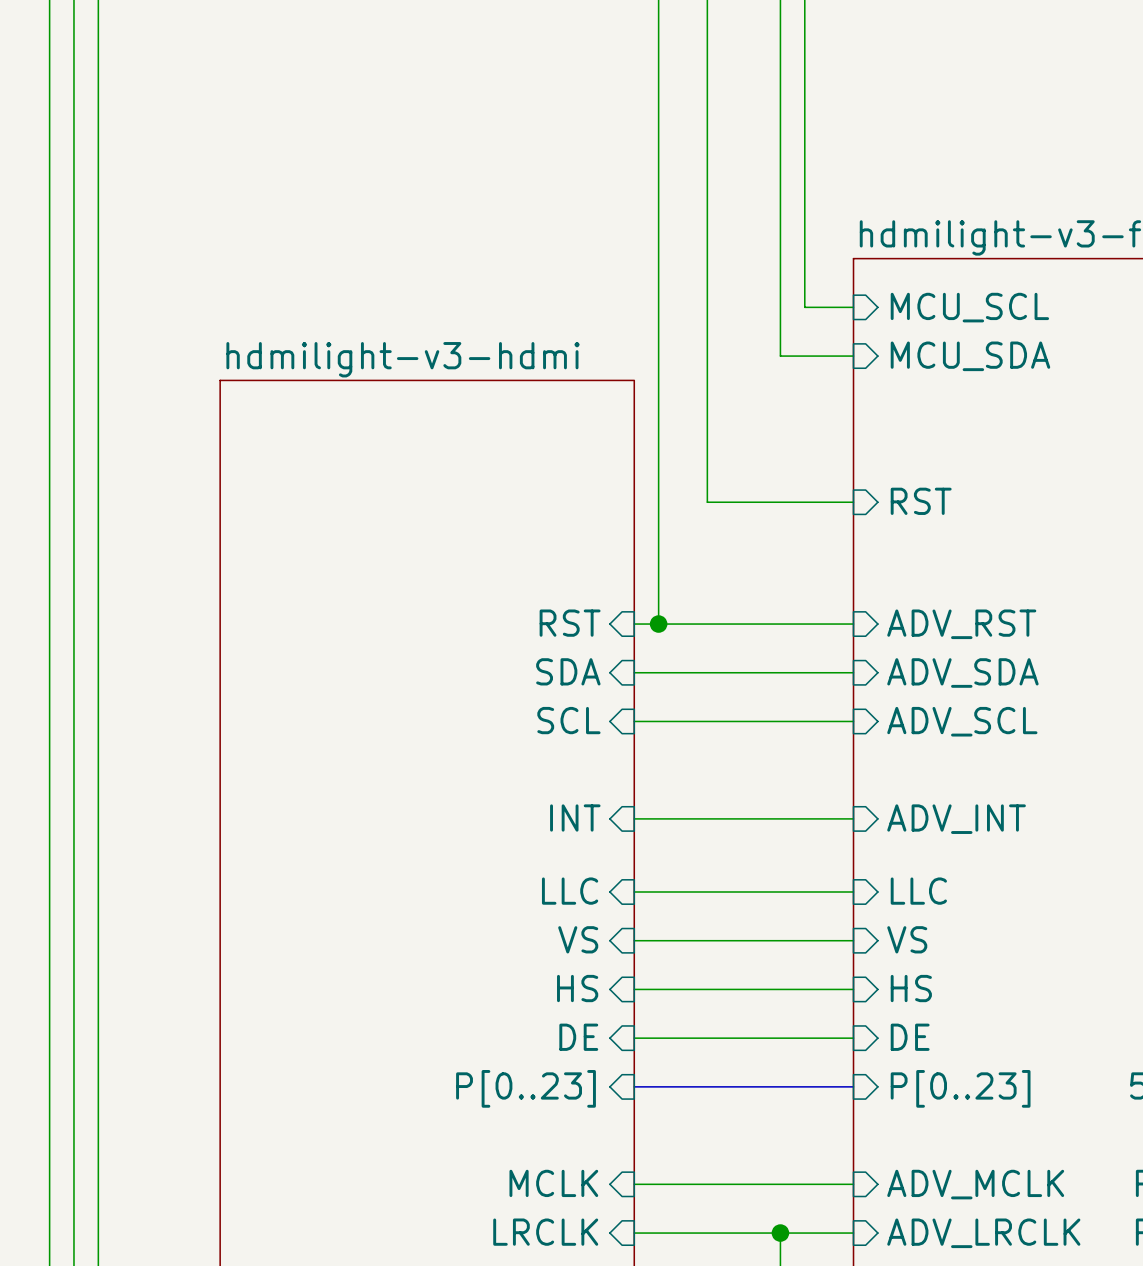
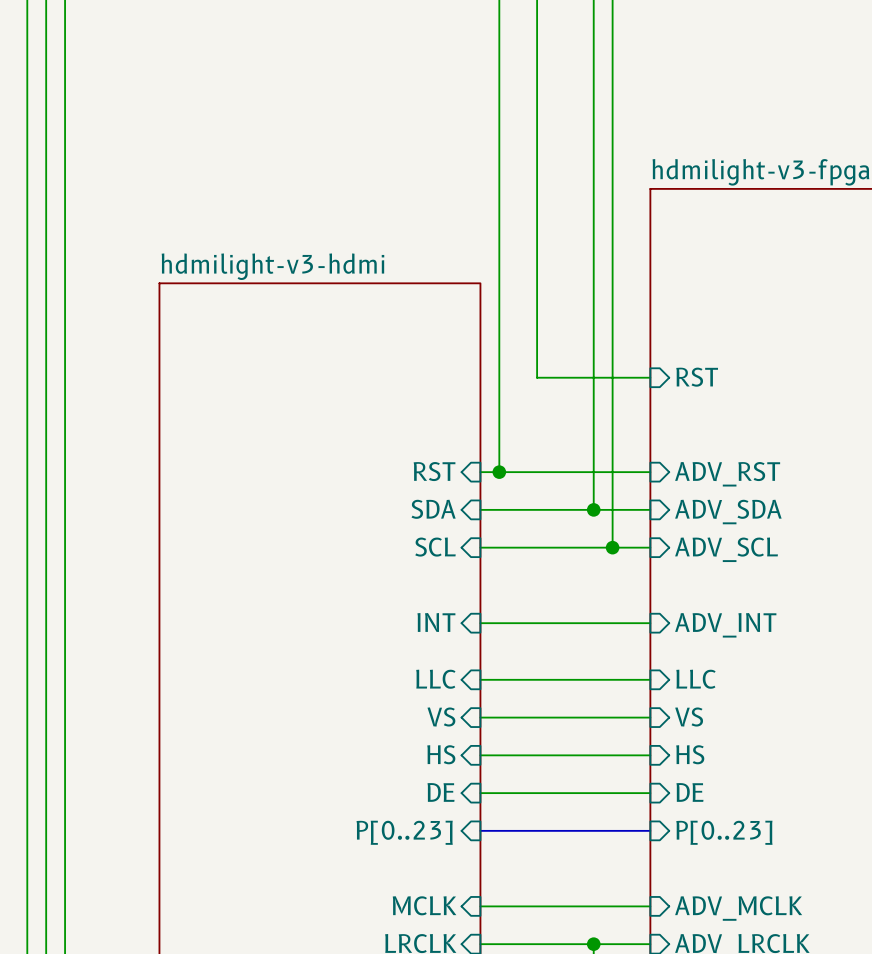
wire: (804, 307) (853, 307) -> (612, 226) (612, 547)
sheet pin: MCU_SCL (969, 307) -> none
wire: (780, 356) (853, 356) -> (593, 264) (593, 509)
sheet pin: MCU_SDA (970, 356) -> none
junction: none -> (593, 509)
junction: none -> (612, 547)

